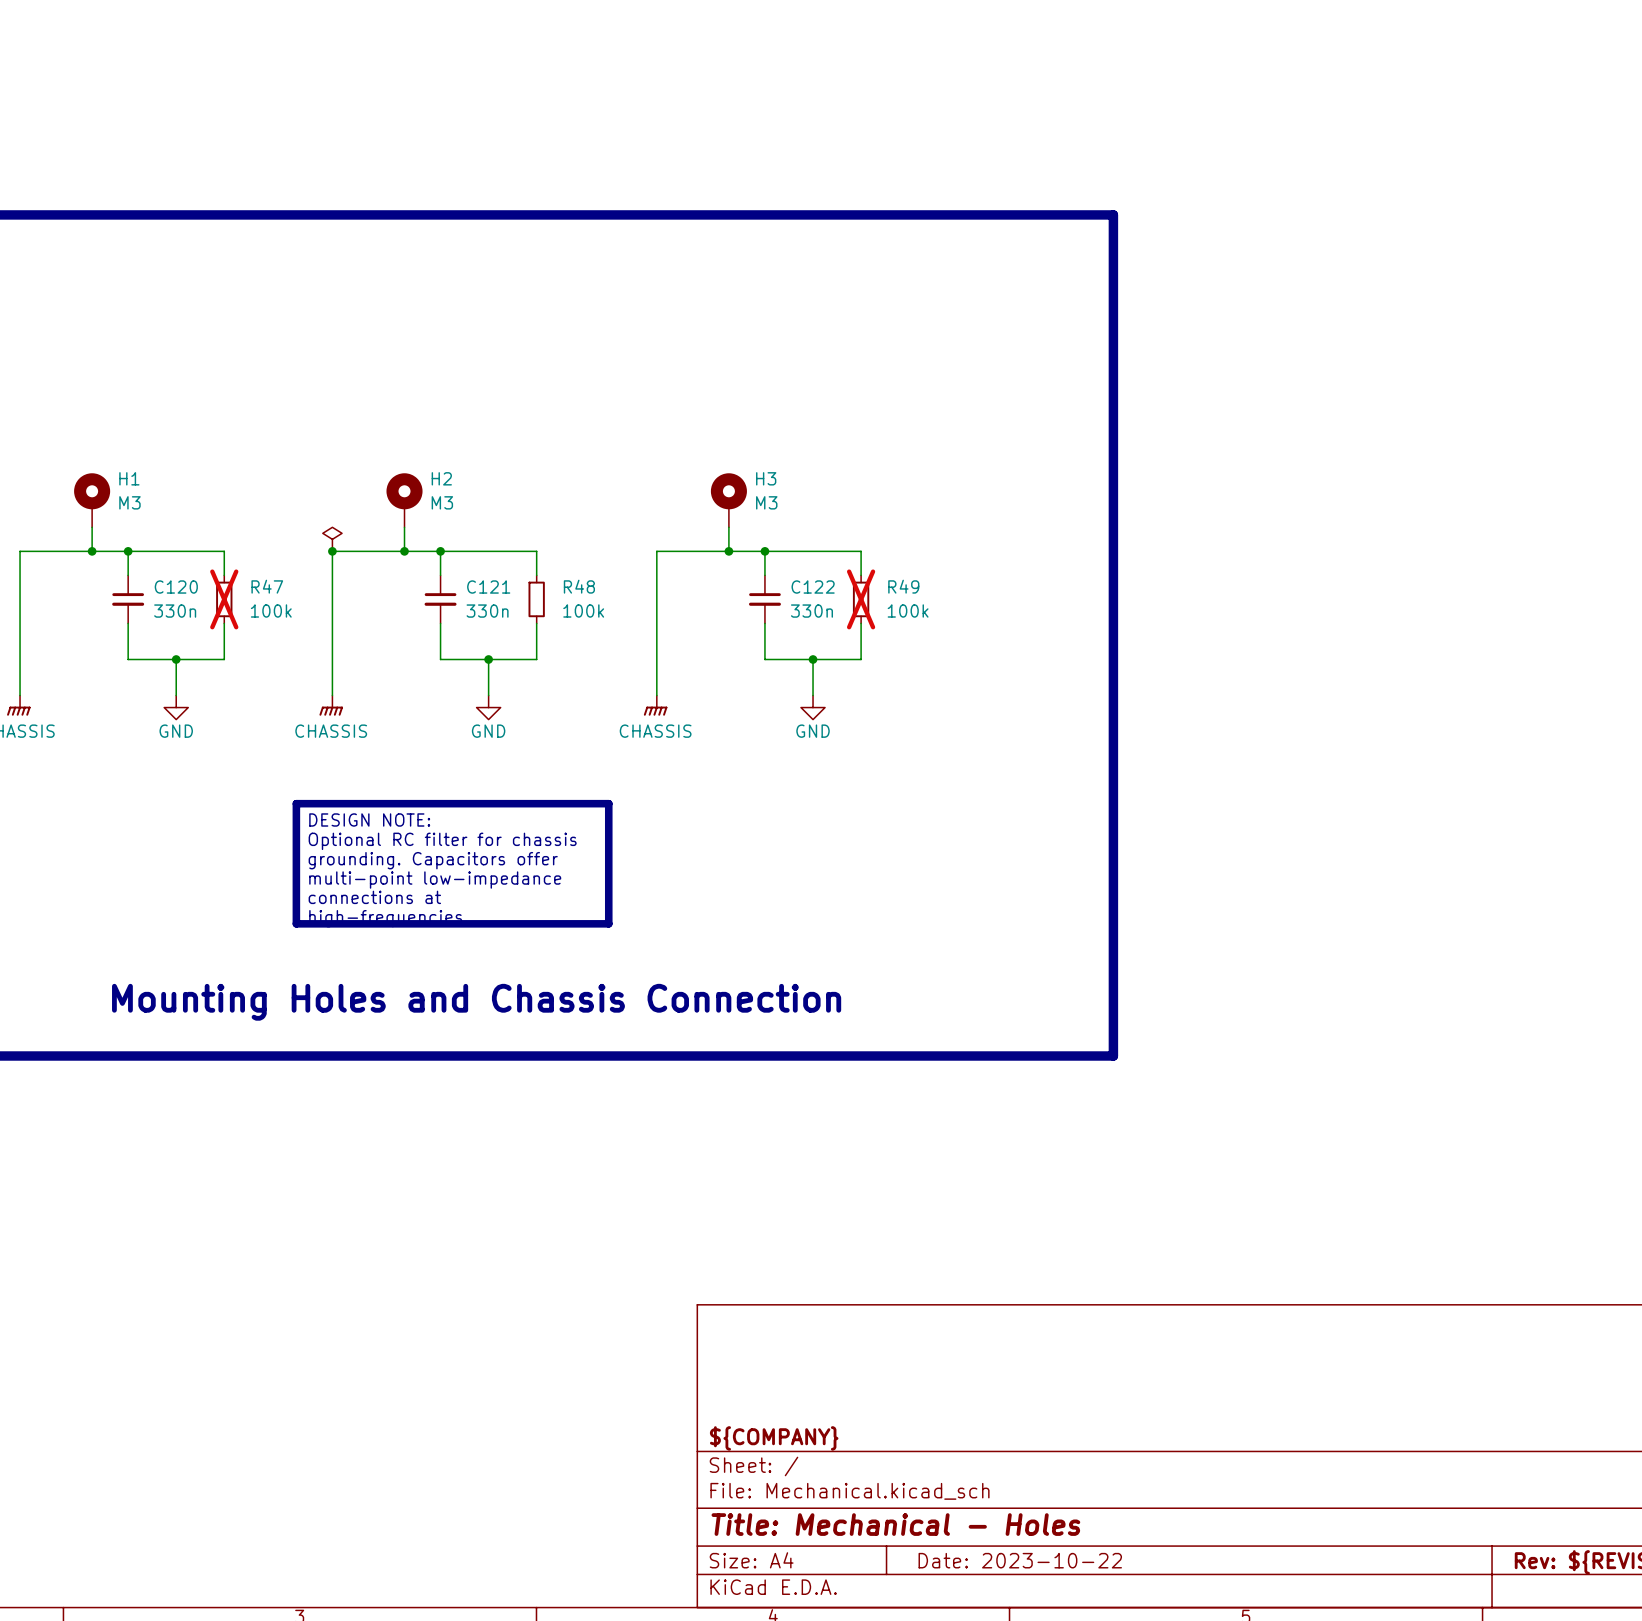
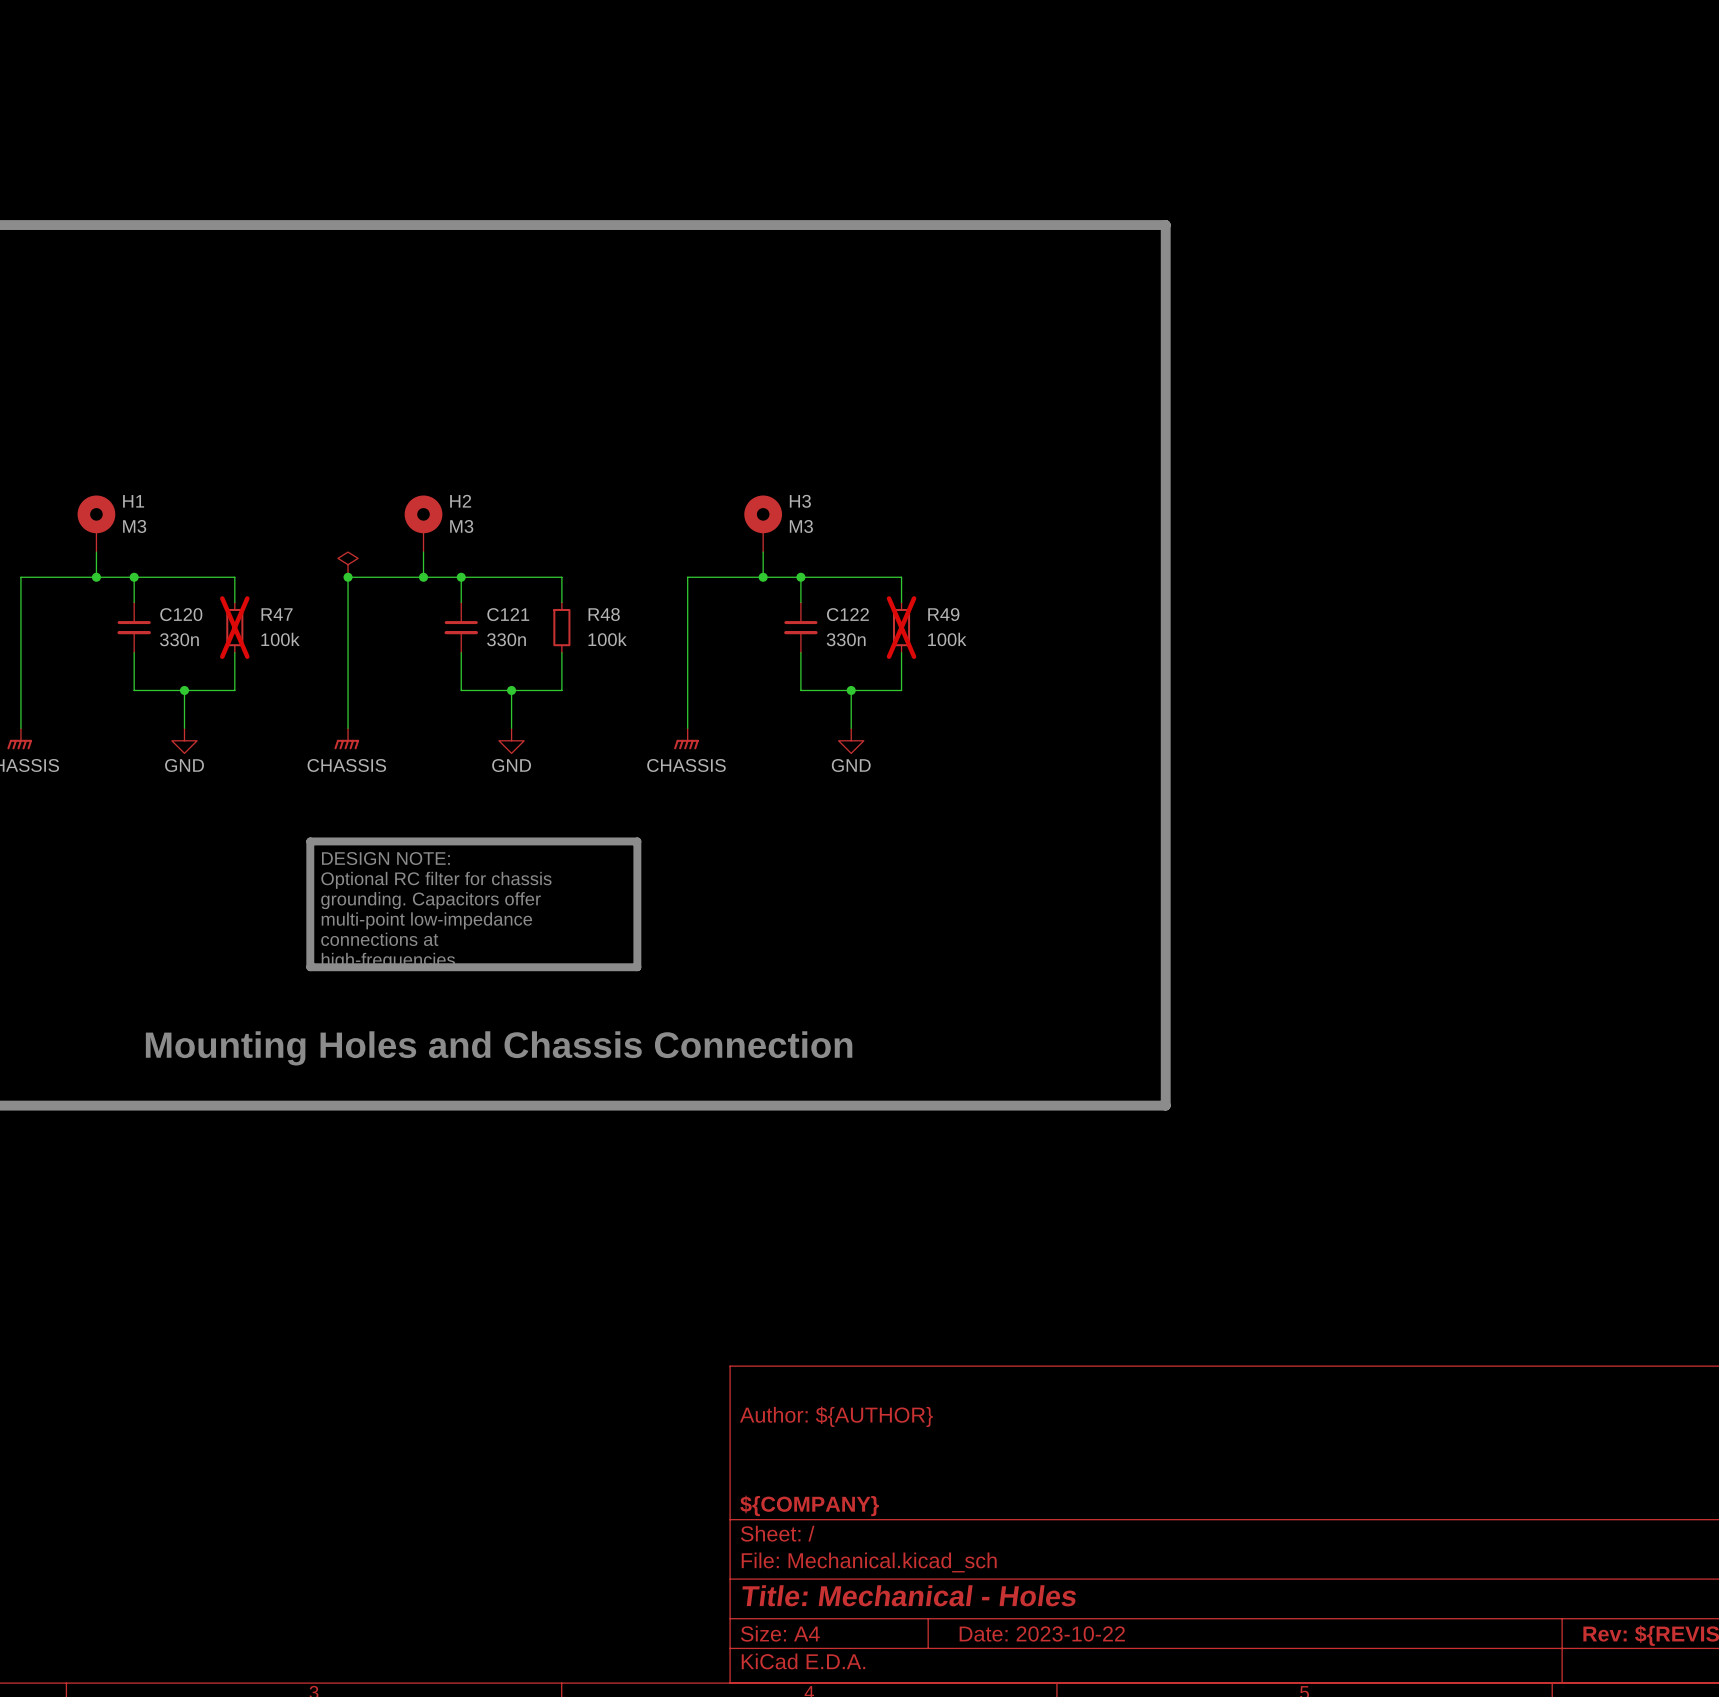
title block: none -> Author: ${AUTHOR} (836, 1416)

